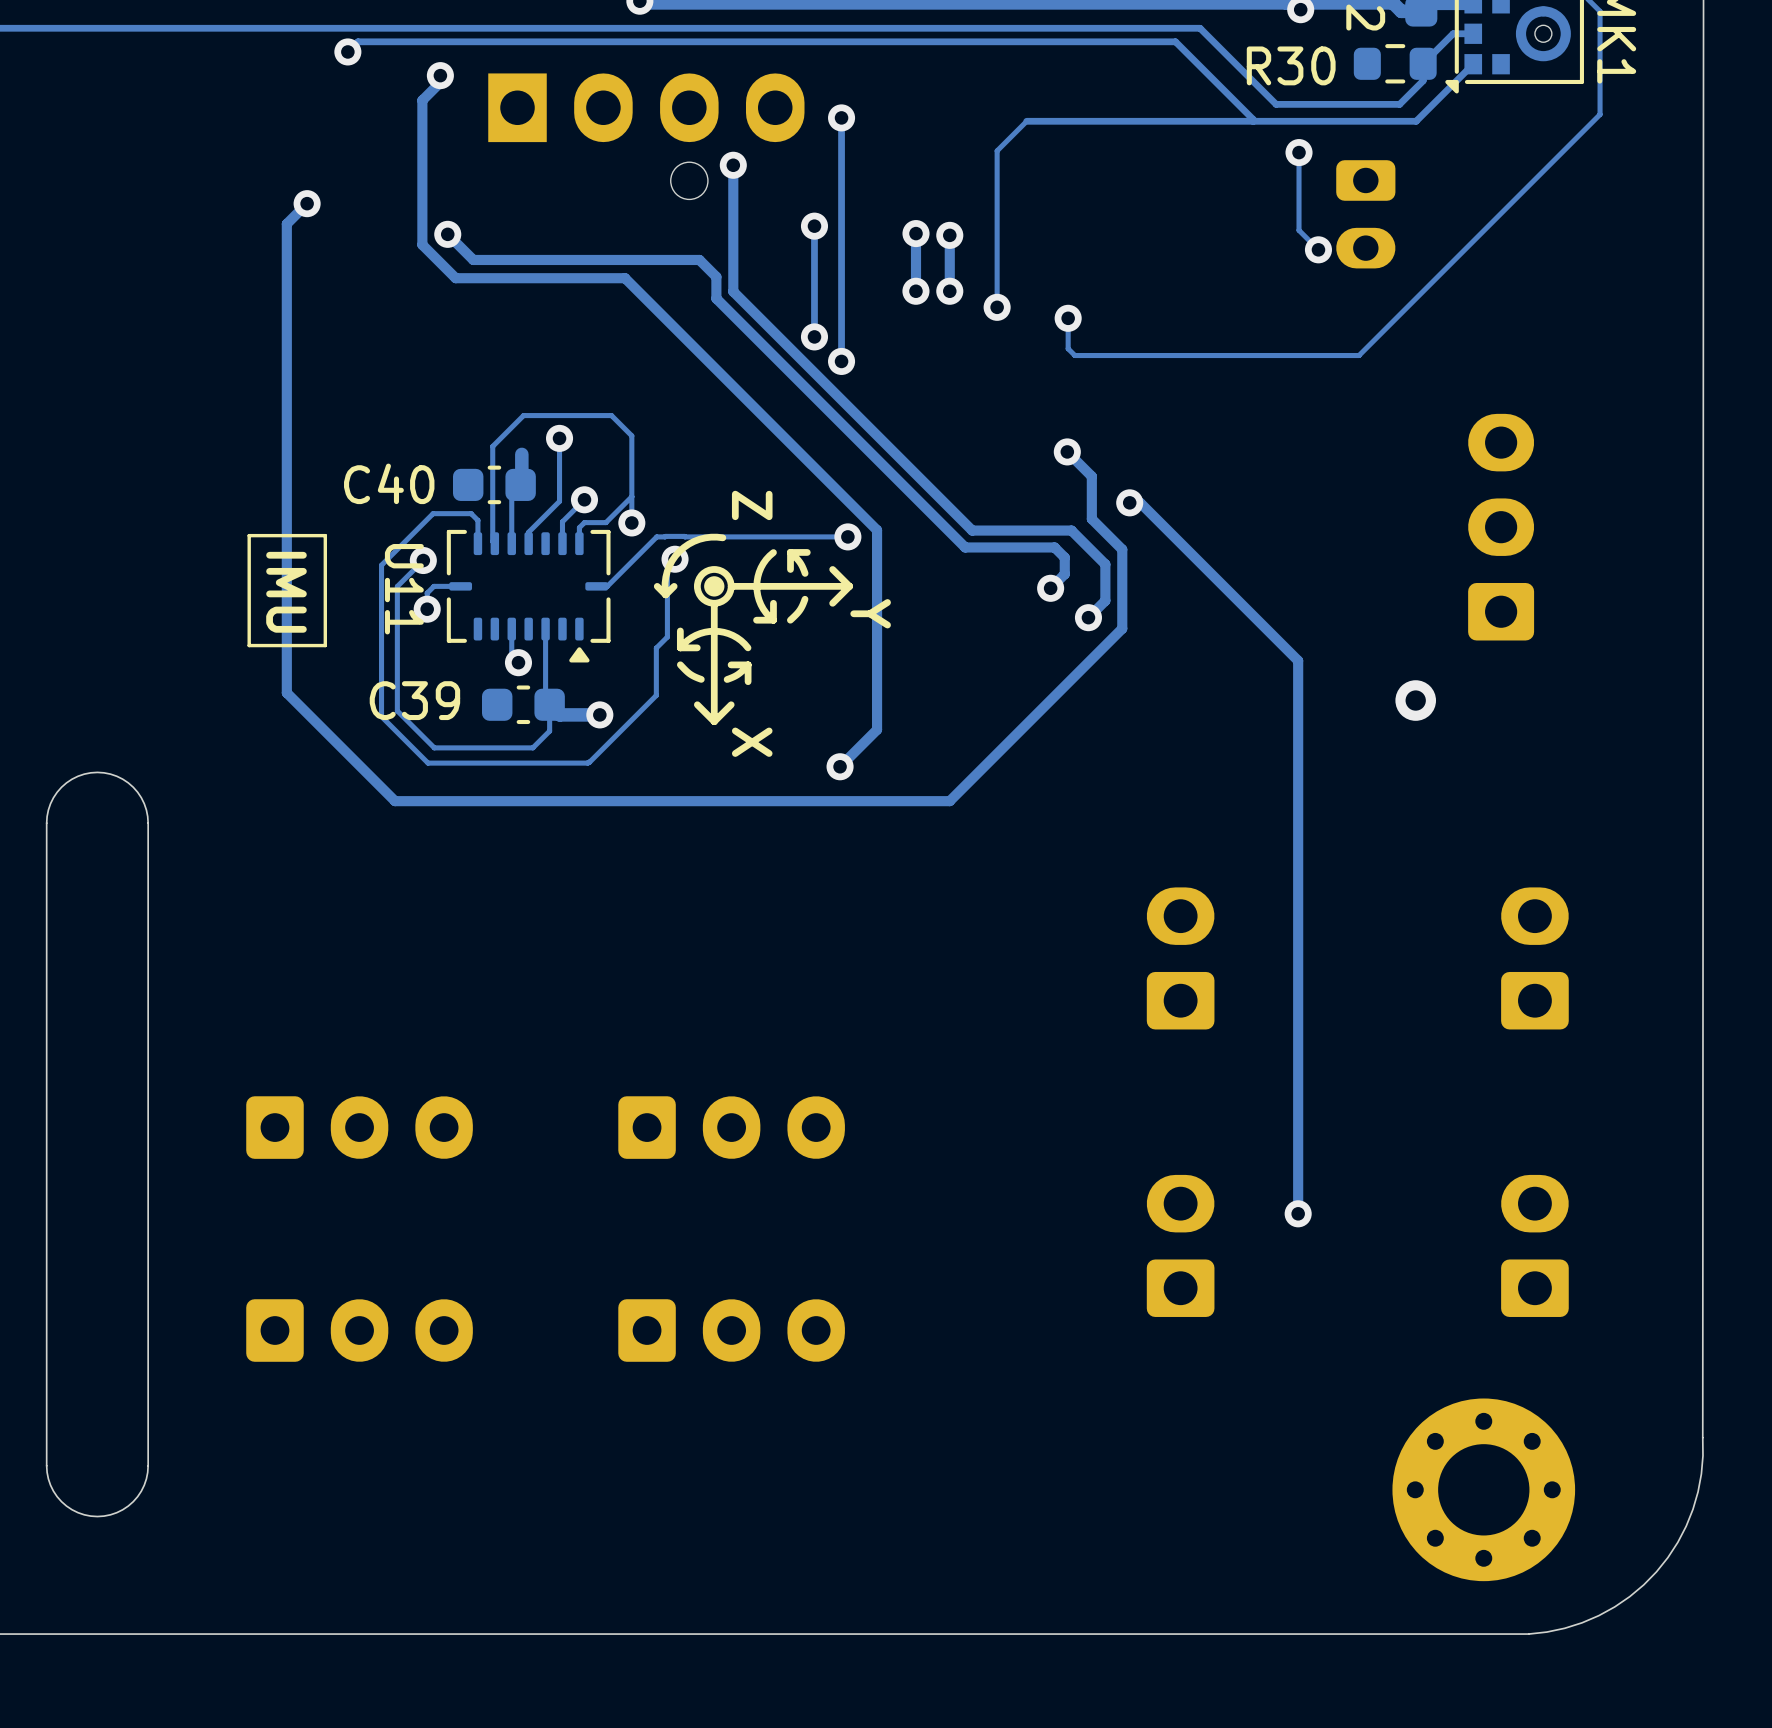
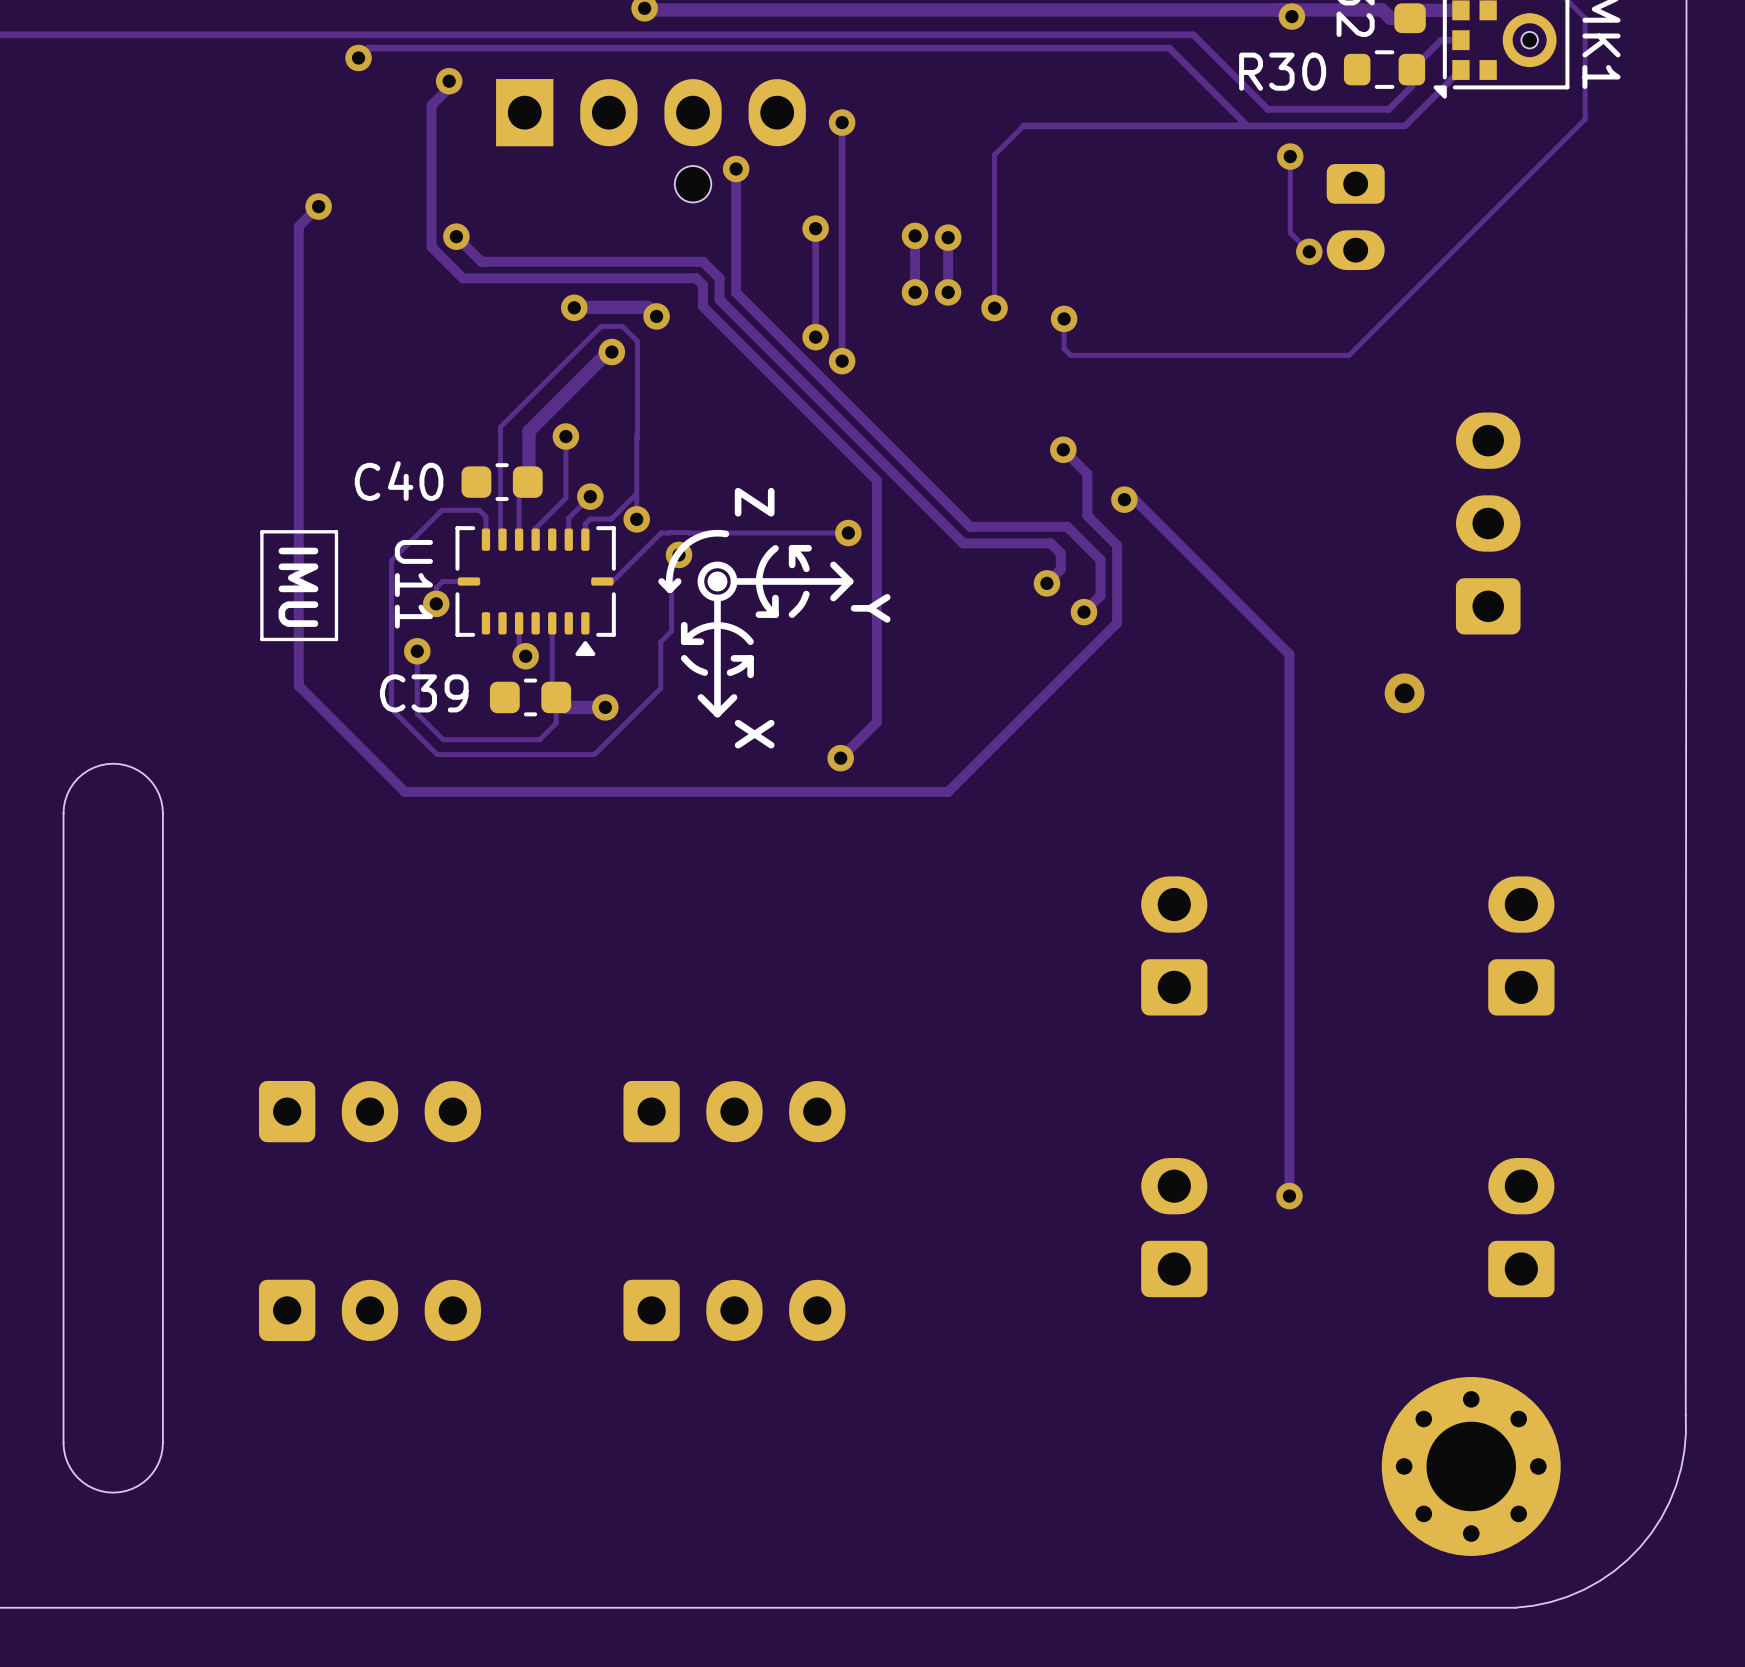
track: (454, 276) (625, 278) (877, 530) -> (462, 278) (696, 278) (702, 285) (702, 306) (876, 480) (876, 526)
track: none -> (574, 307) (647, 307) (656, 316)
via: none -> (574, 307)
via: none -> (656, 316)
track: none -> (611, 352) (608, 352) (528, 431) (528, 452)
via: none -> (611, 352)
track: (631, 435) (611, 415) (523, 415) (492, 446) -> (636, 439) (637, 341) (622, 326) (601, 326) (500, 427) (500, 444)
track: (423, 560) (397, 586) (397, 710) (407, 721) -> (417, 651) (417, 713)
via position: (423, 560) -> (417, 651)

